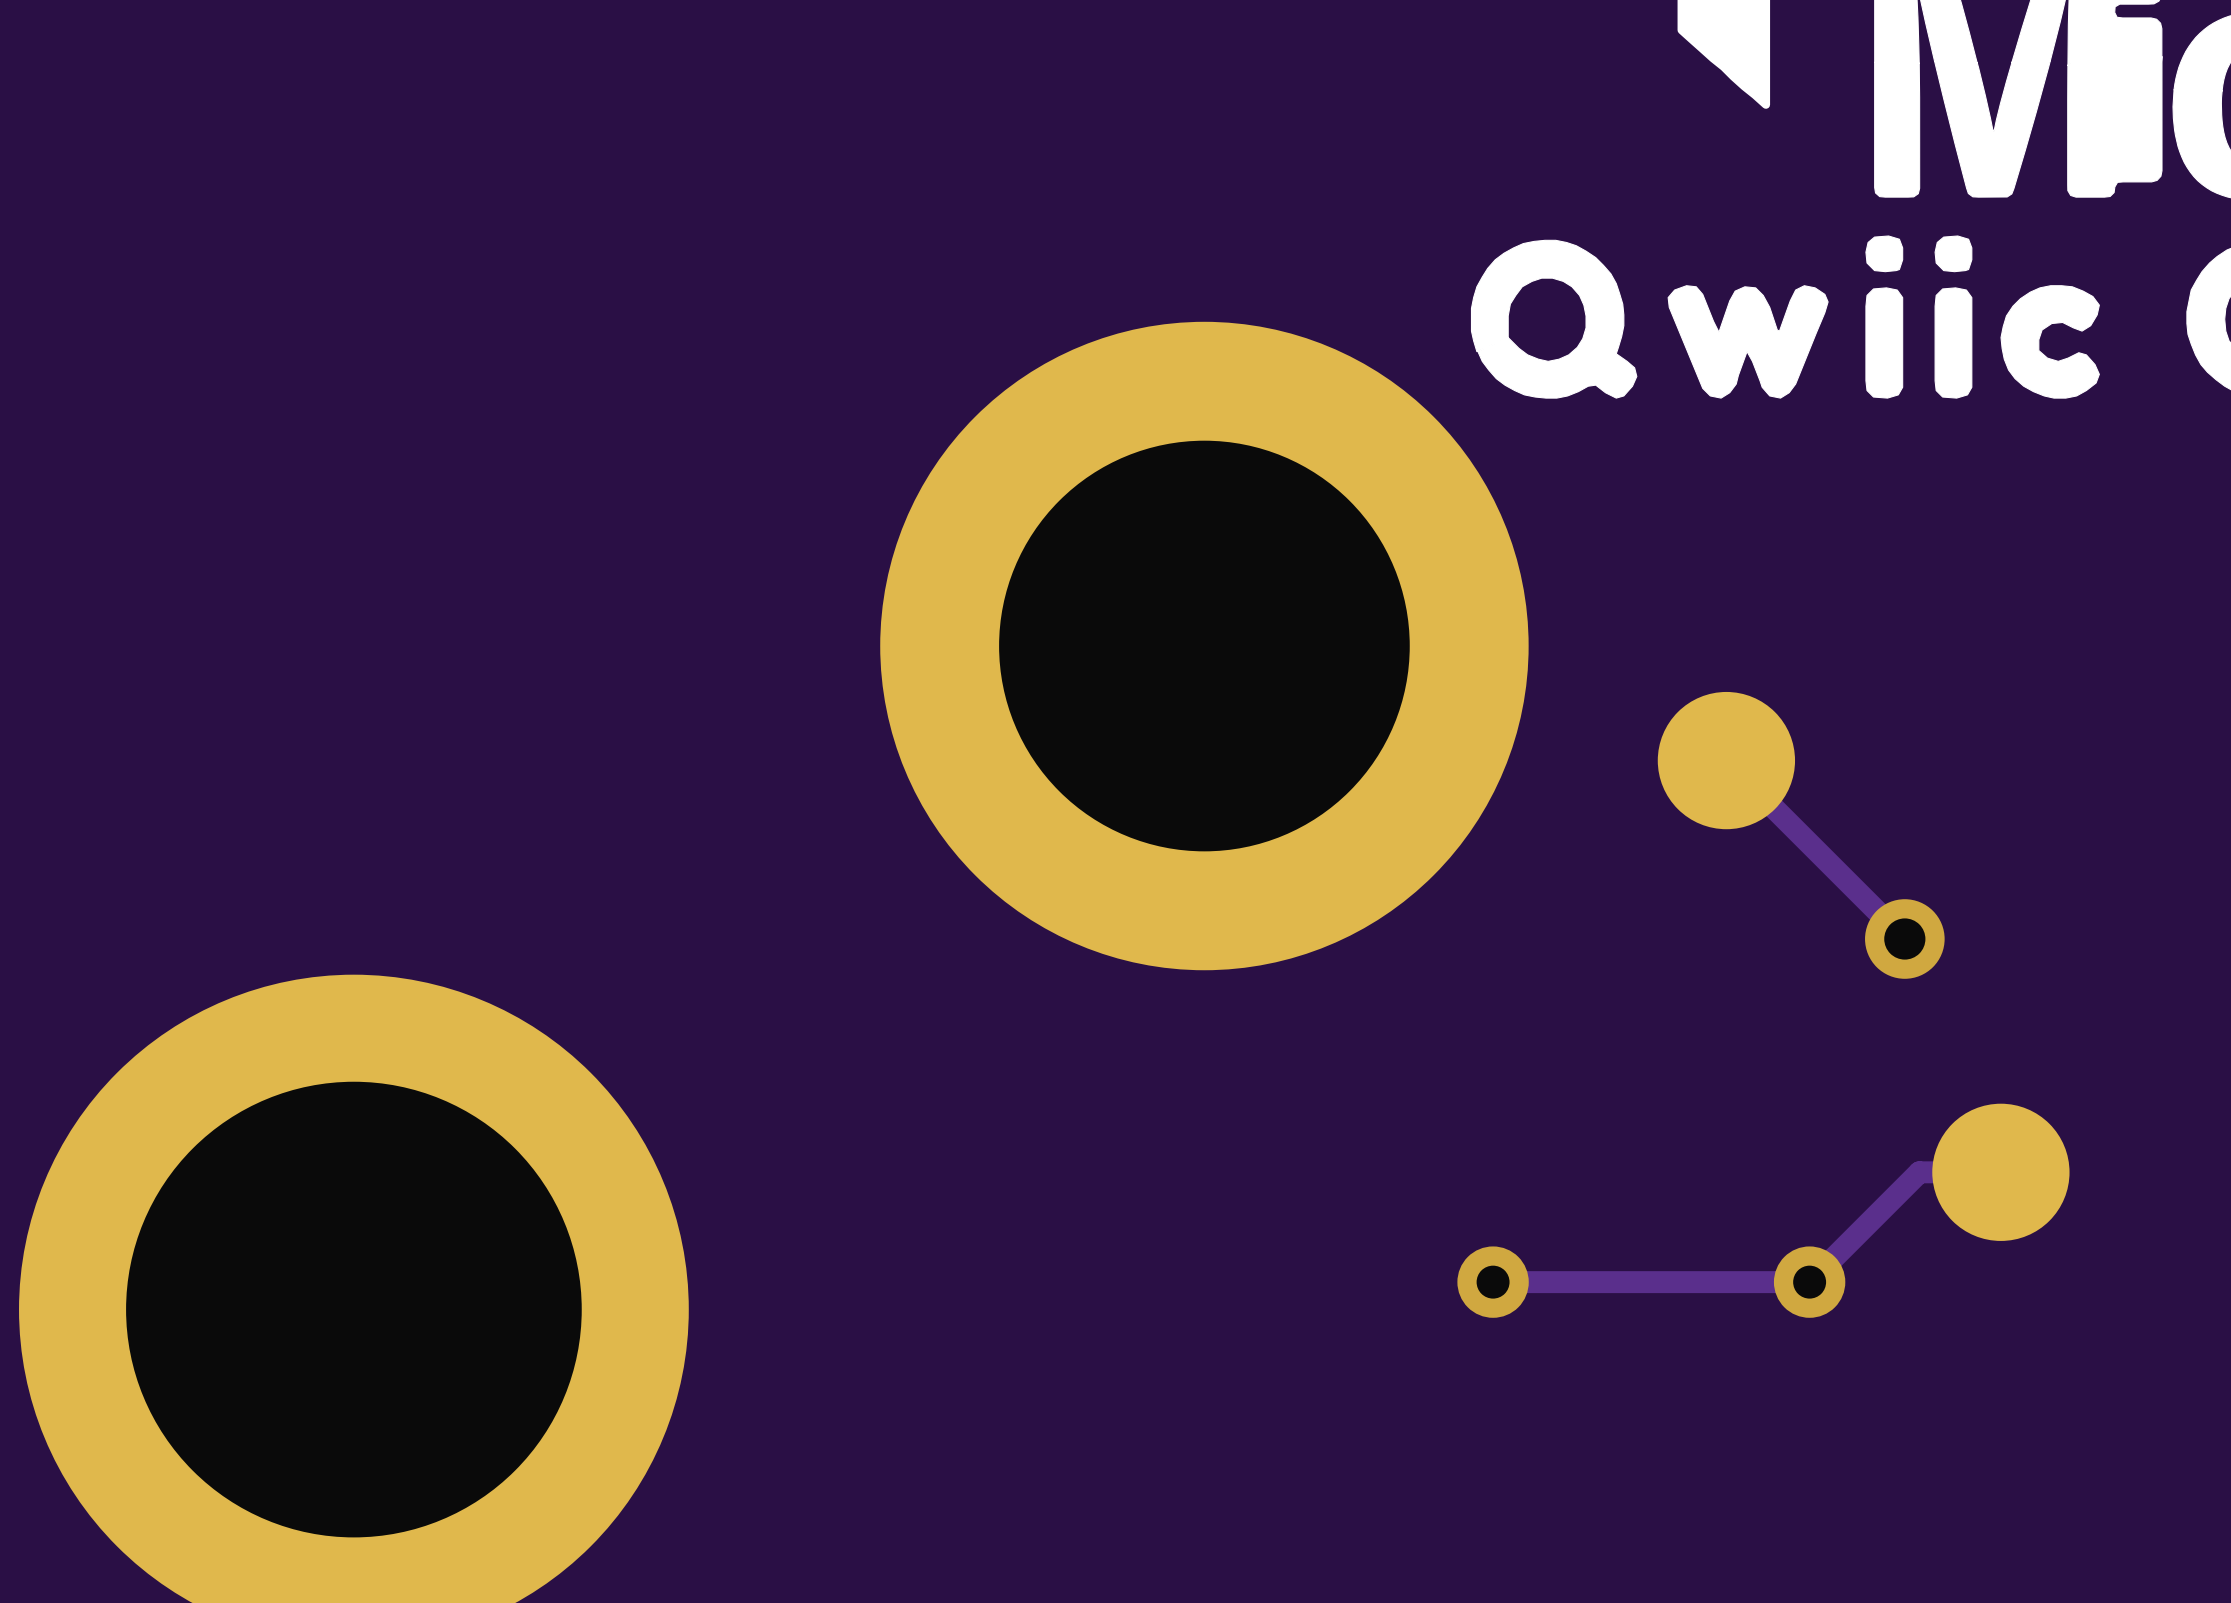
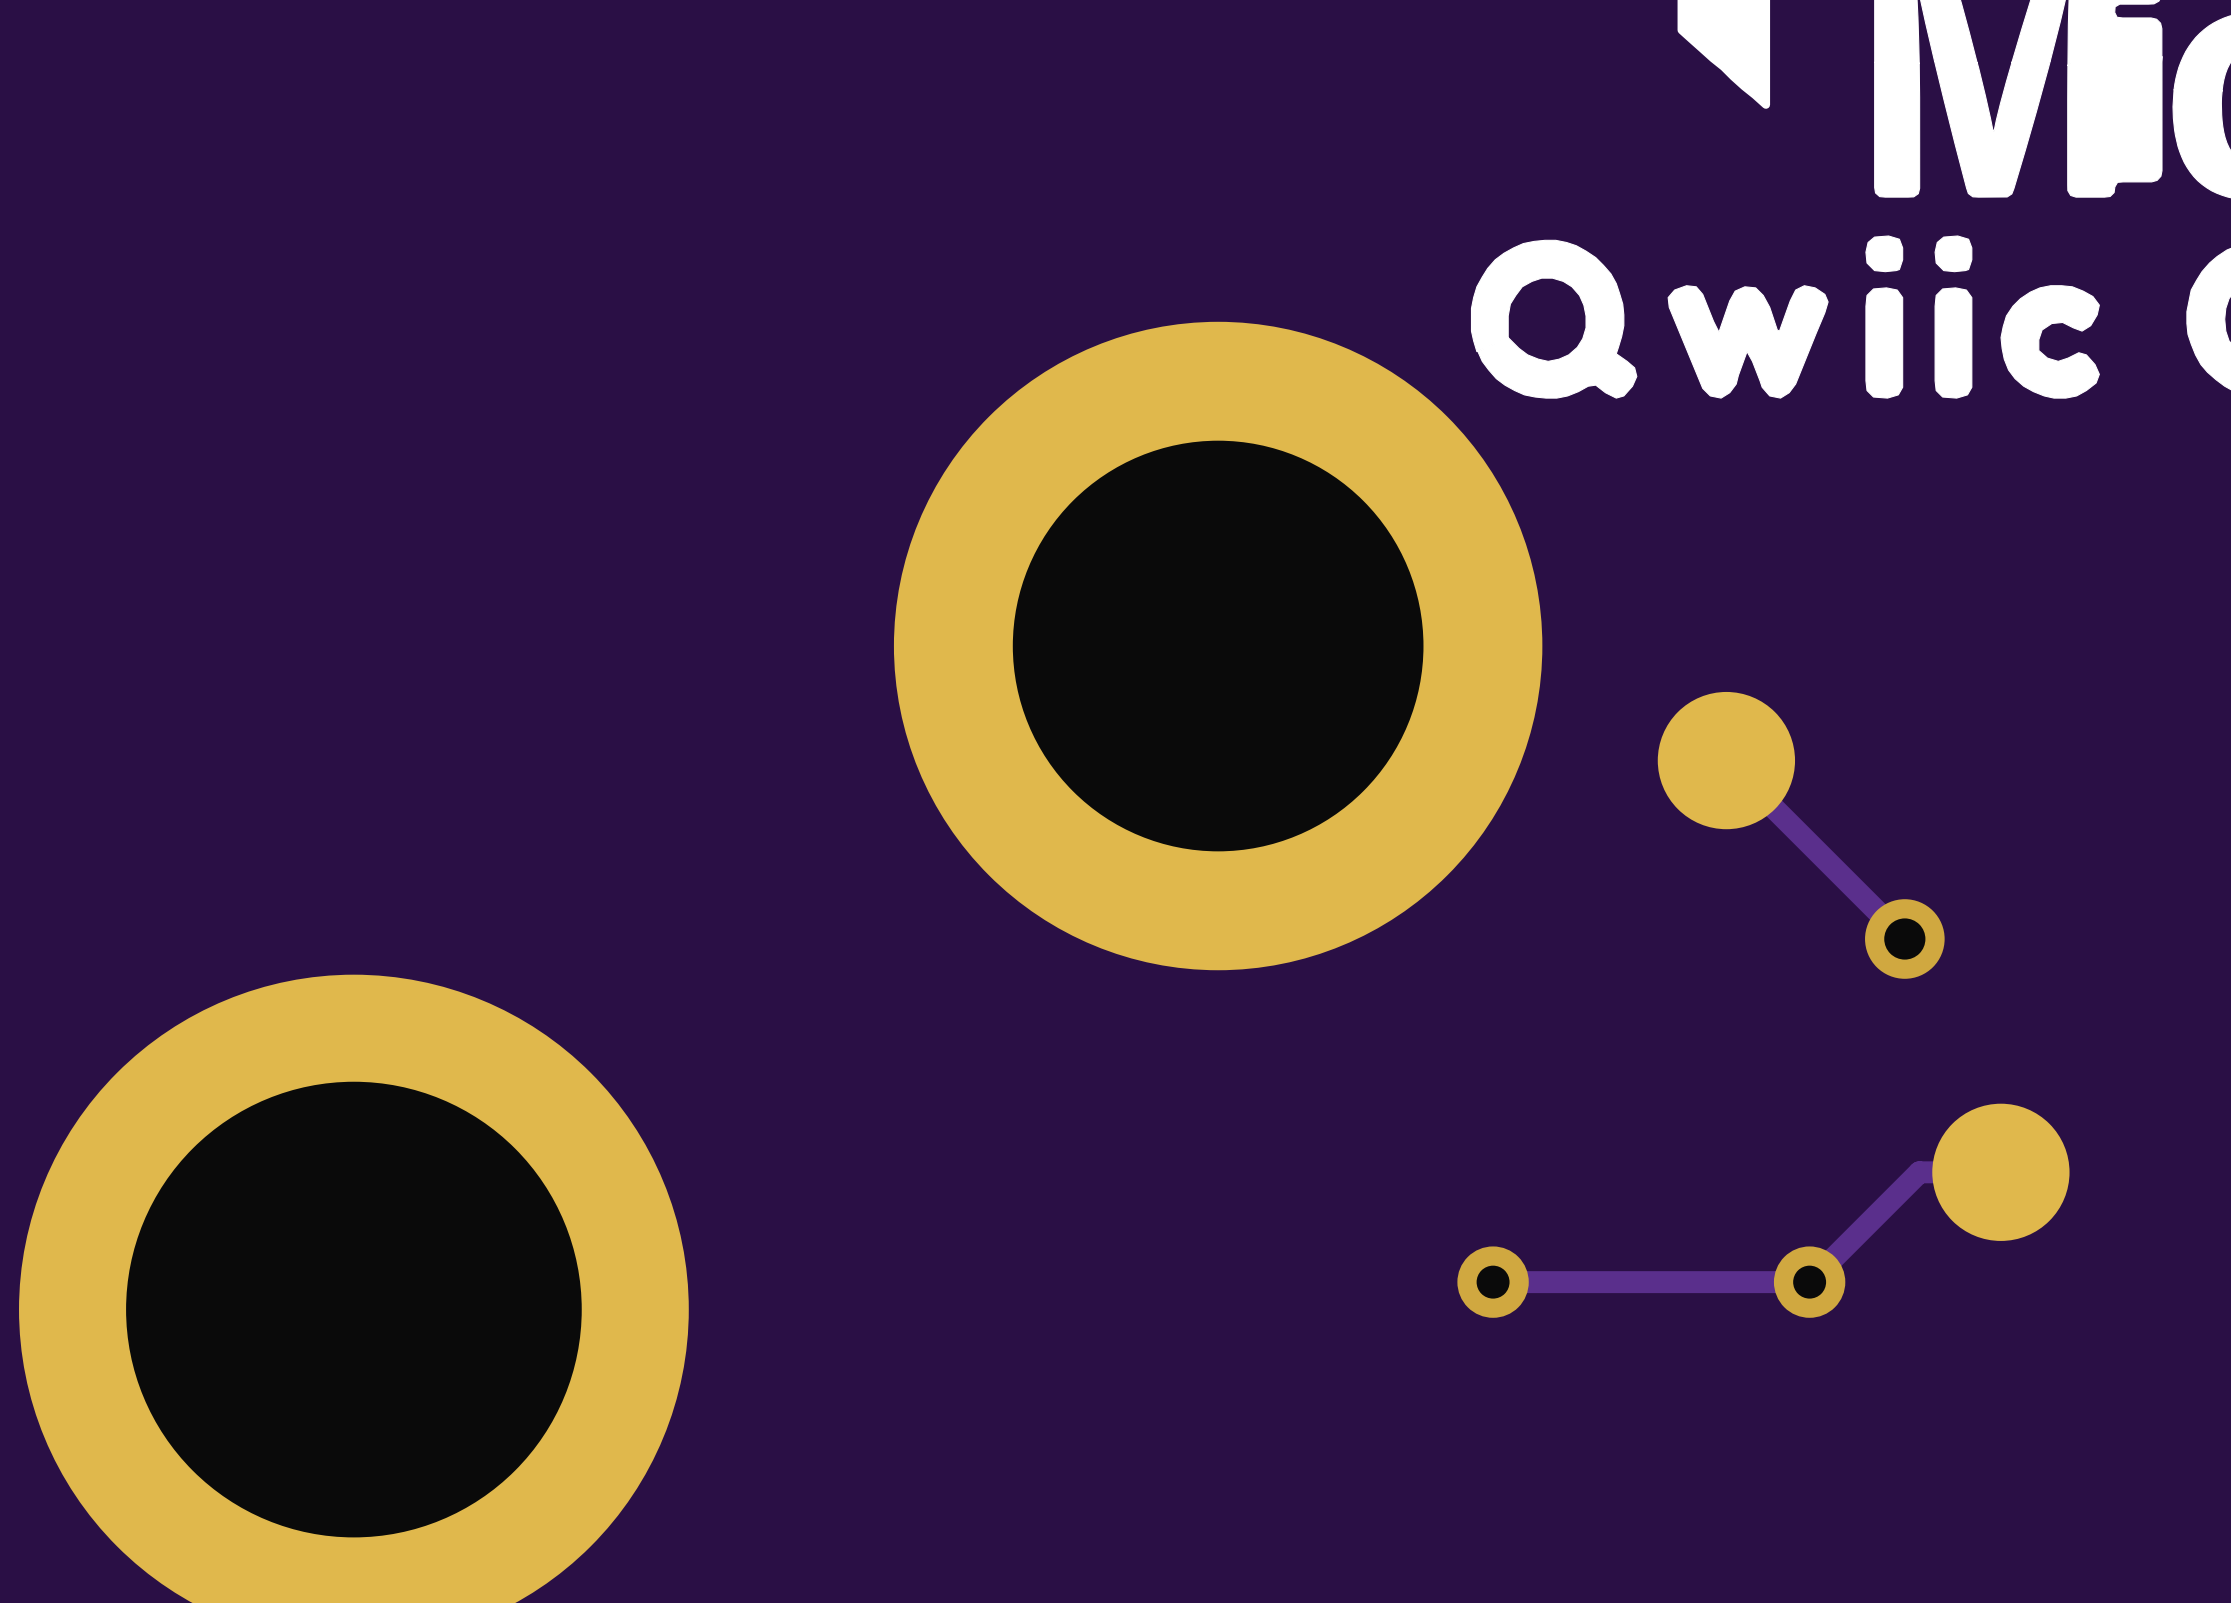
part position: (1204, 646) -> (1218, 646)

